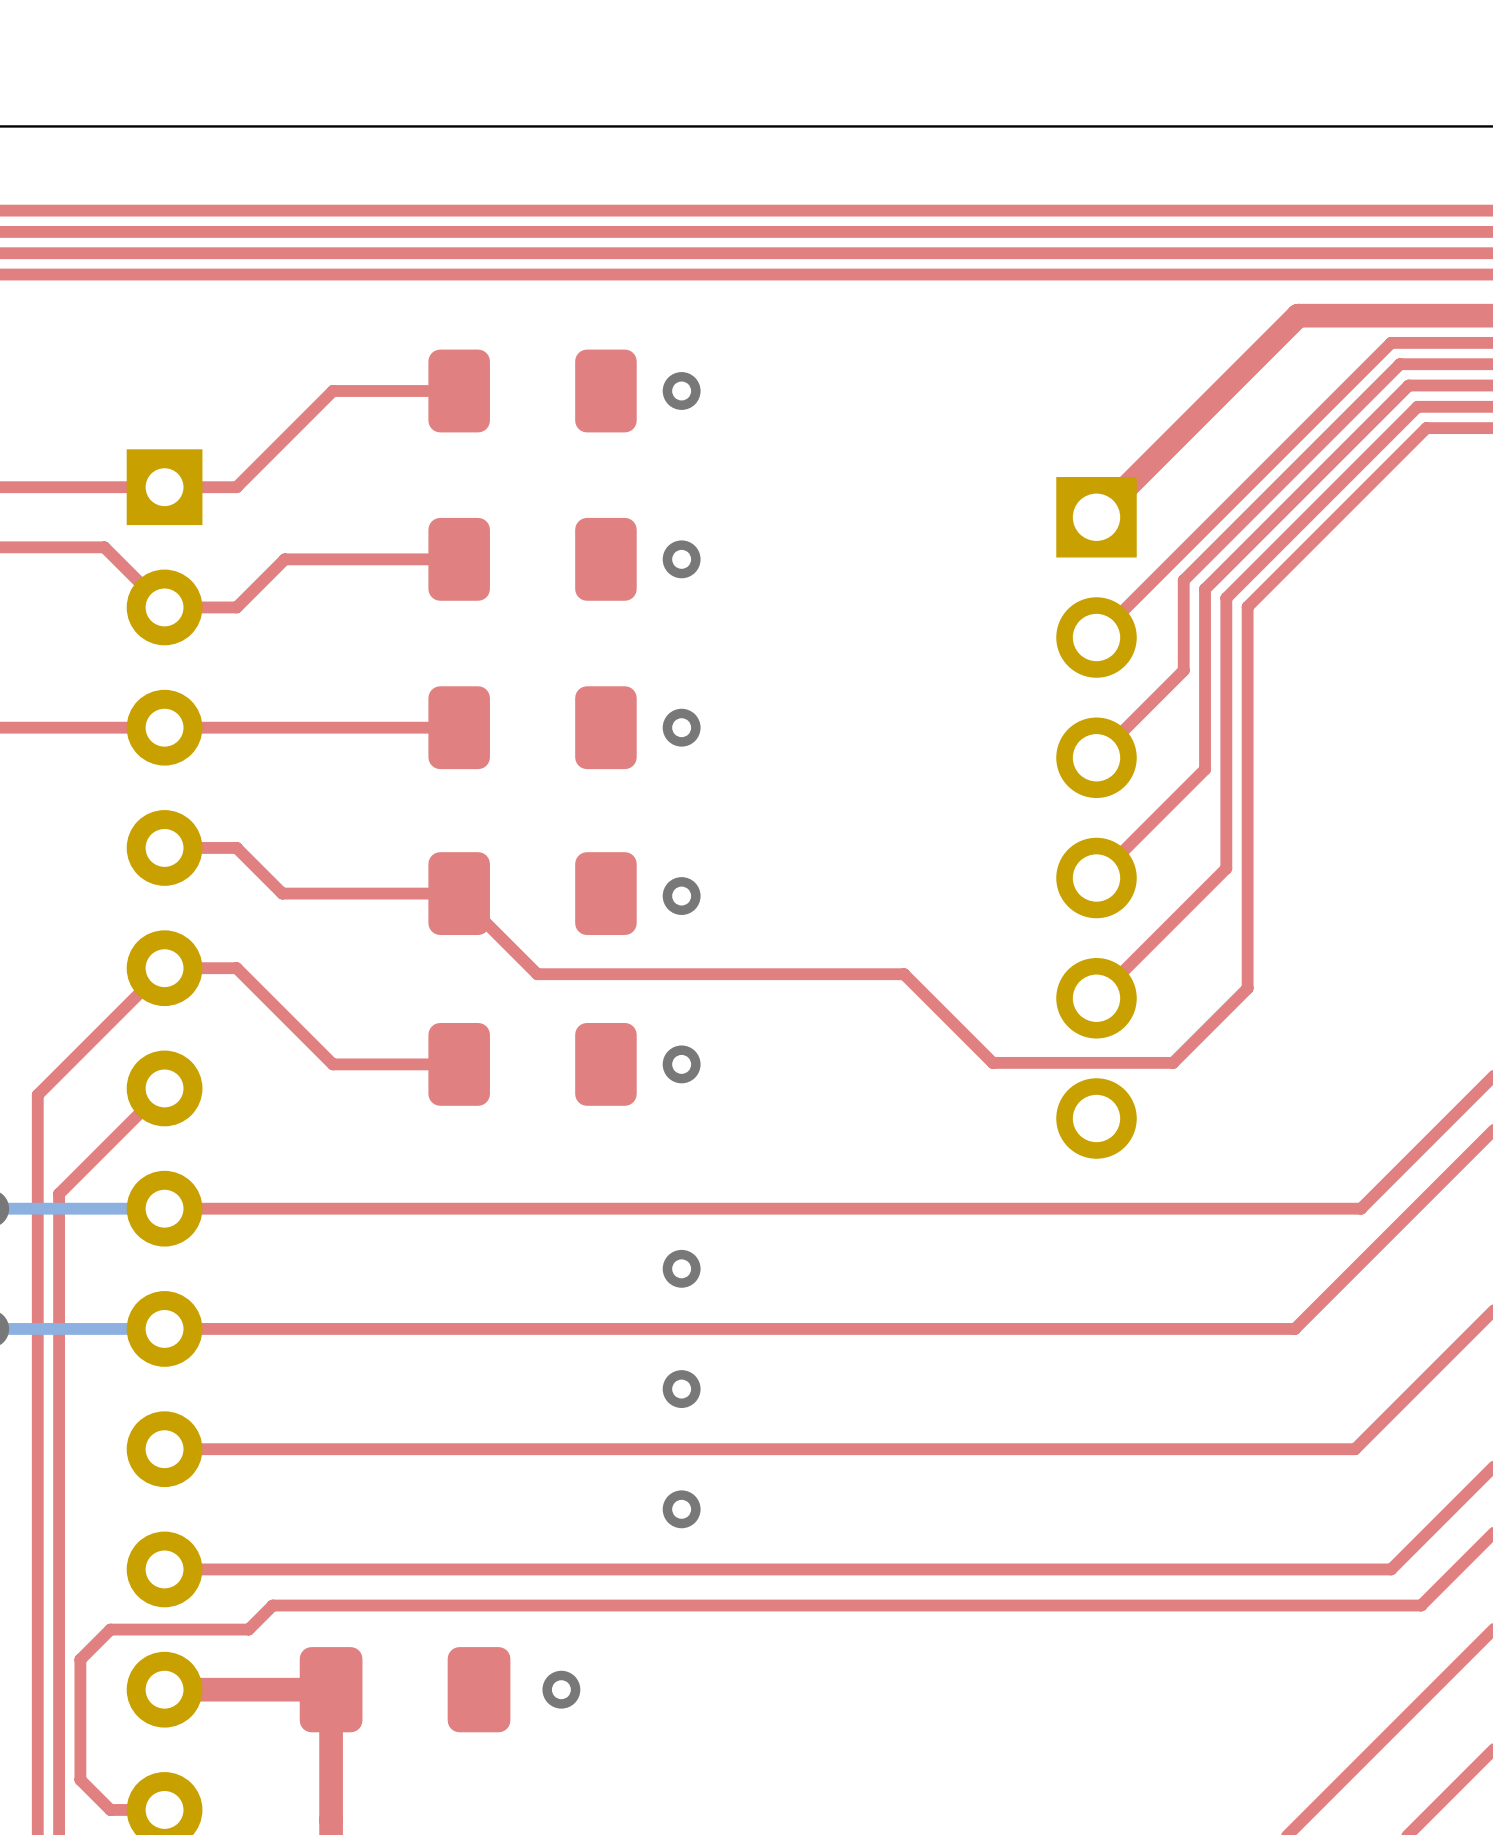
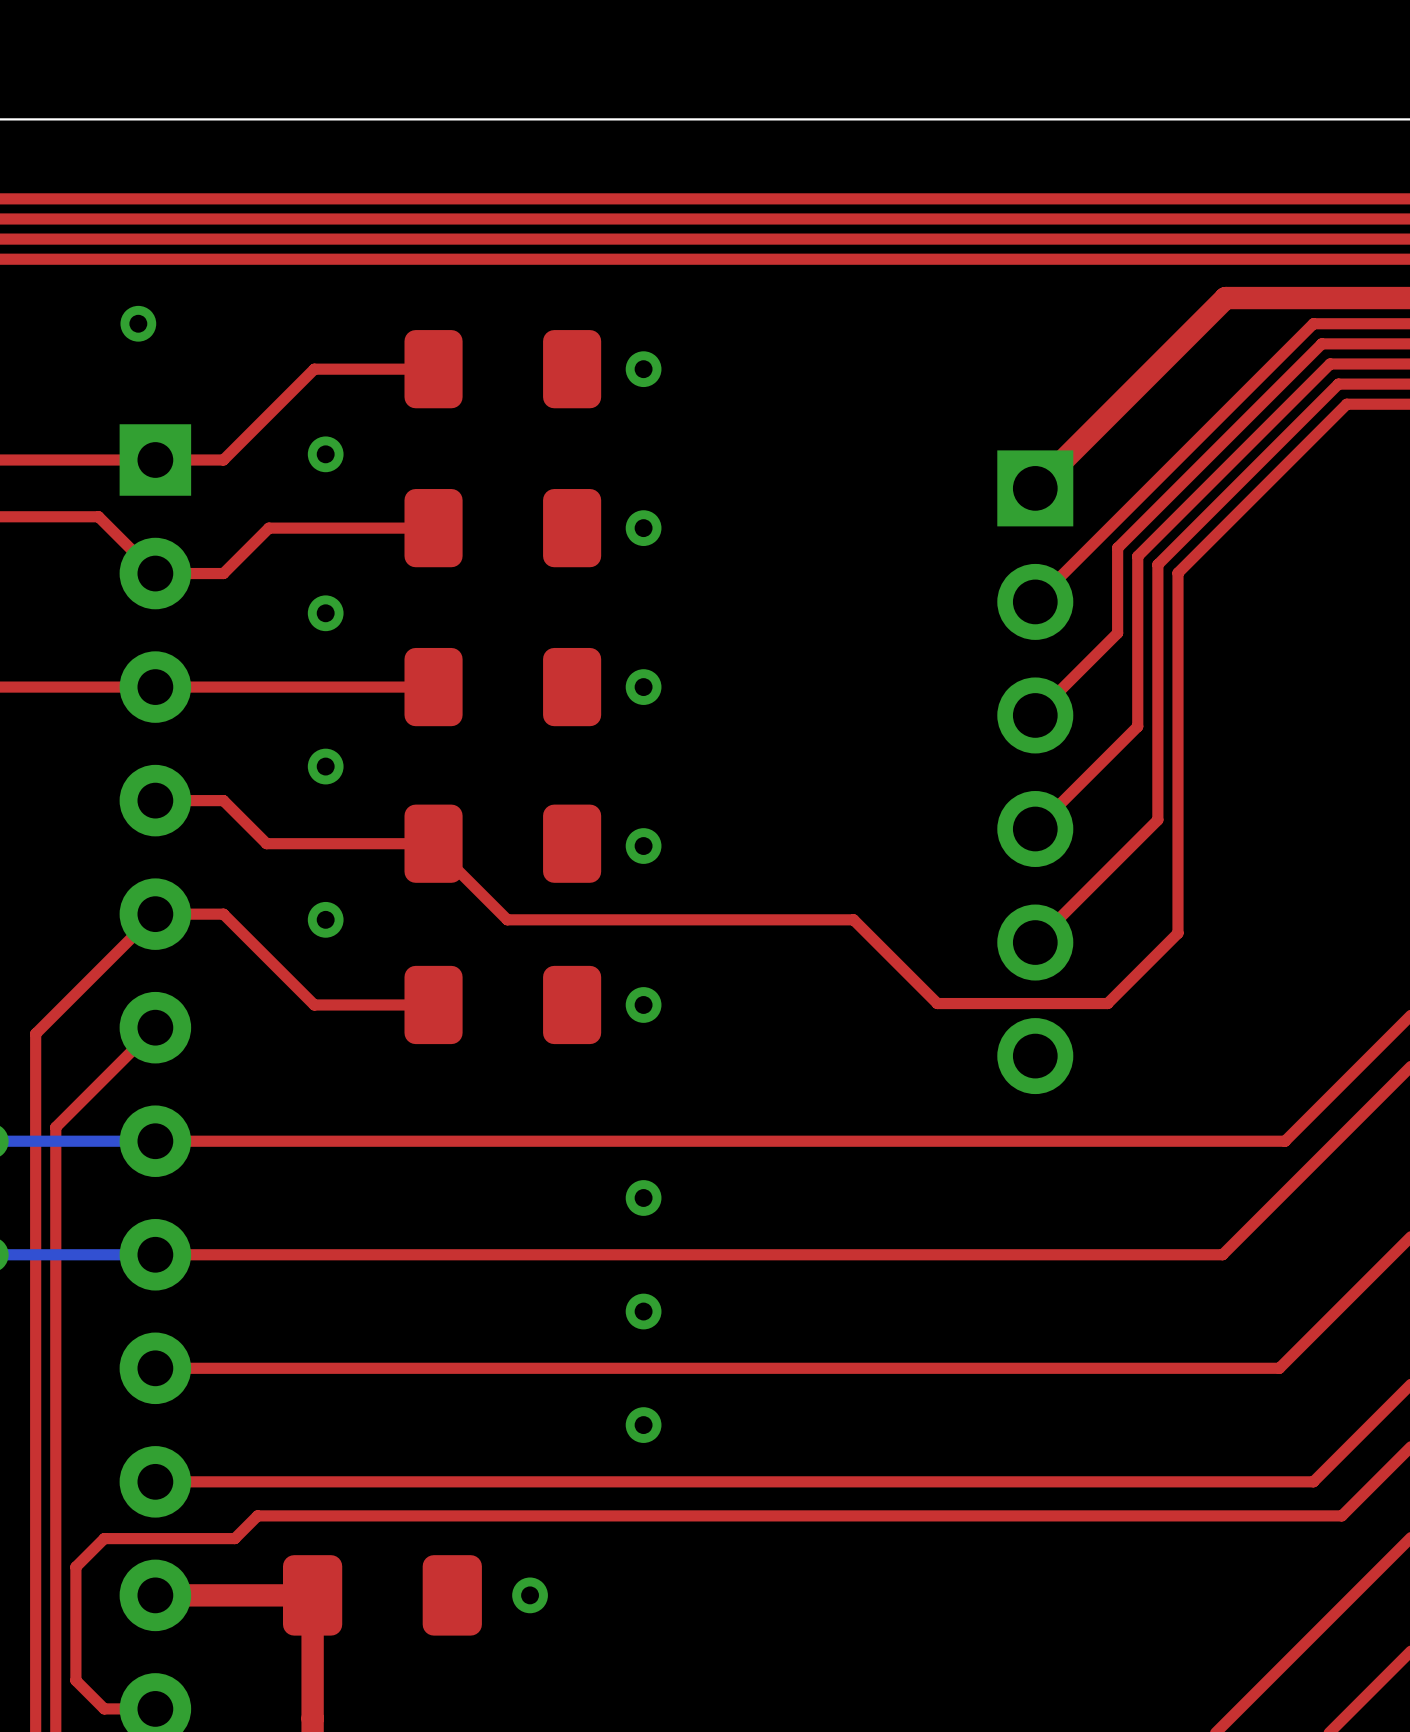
via: none -> (138, 323)
via: none -> (325, 454)
via: none -> (325, 613)
via: none -> (325, 766)
via: none -> (325, 919)

